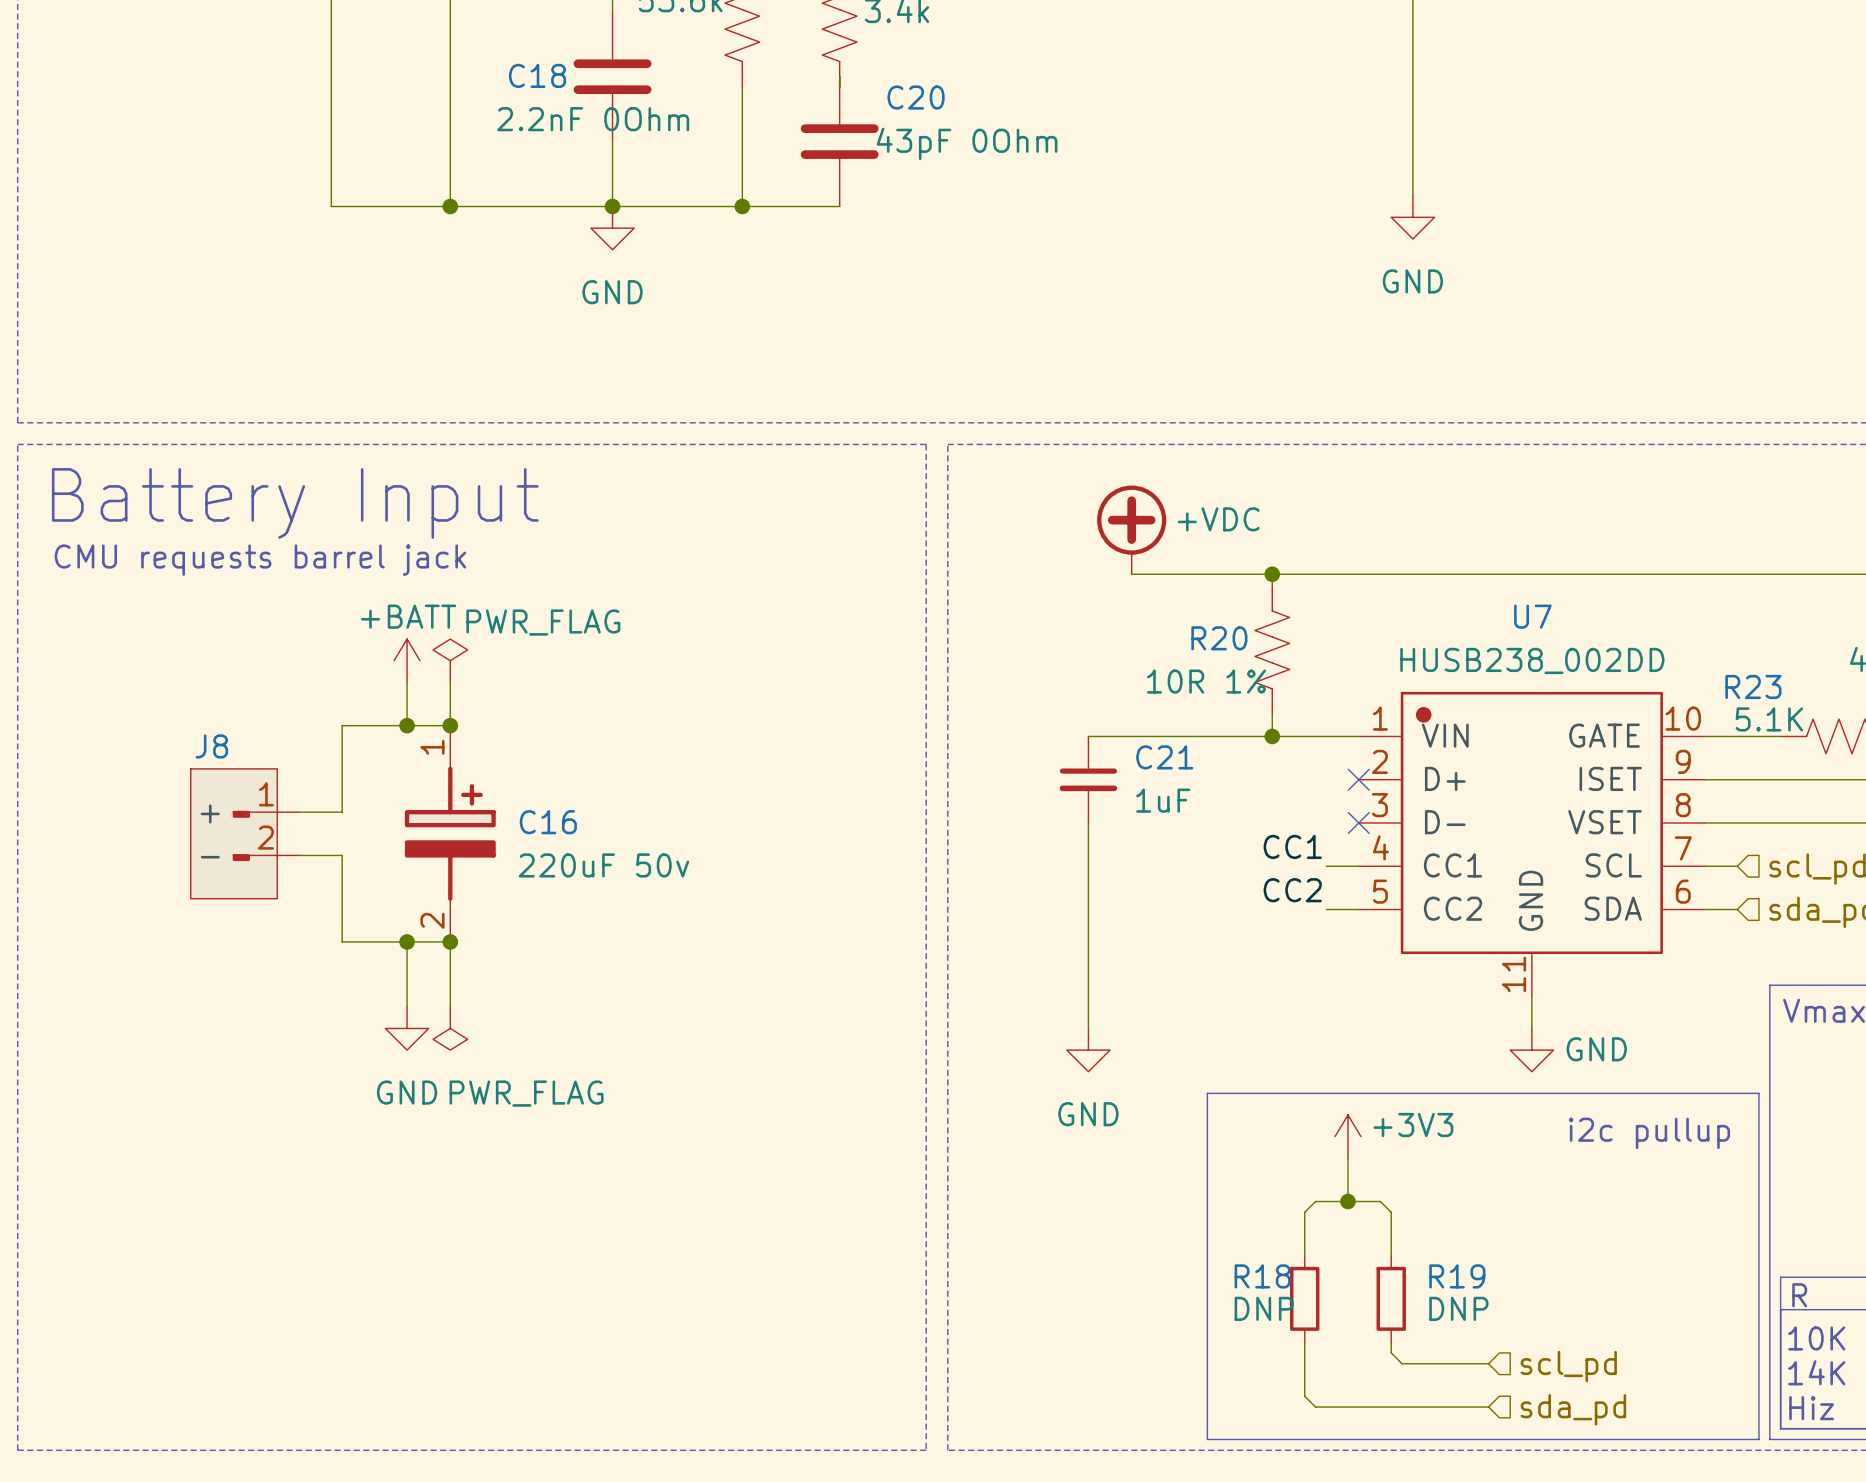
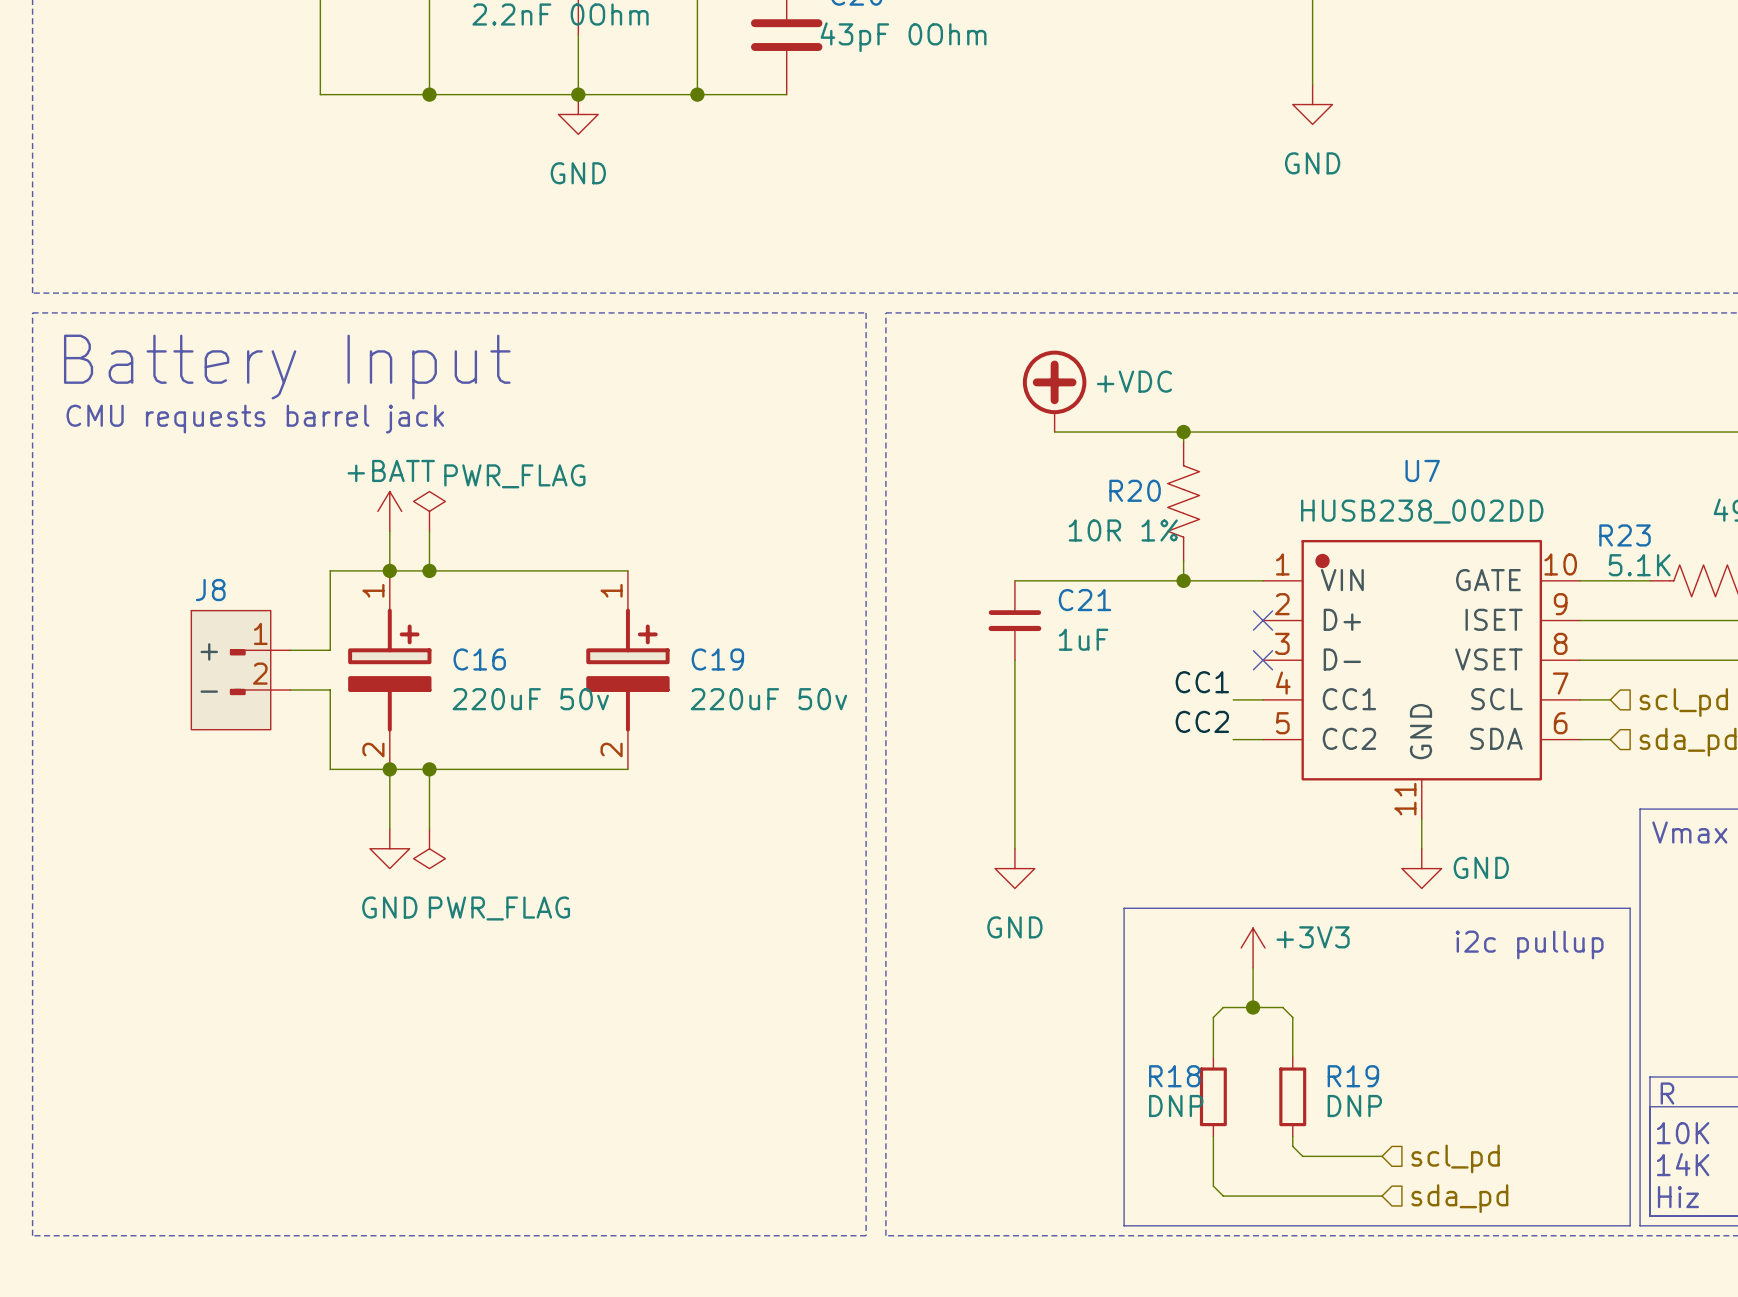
wire: none -> (429, 570) (627, 570)
C16 position: (450, 833) -> (389, 670)
C19: none -> 220uF 50v (627, 670)
wire: none -> (429, 769) (627, 769)

